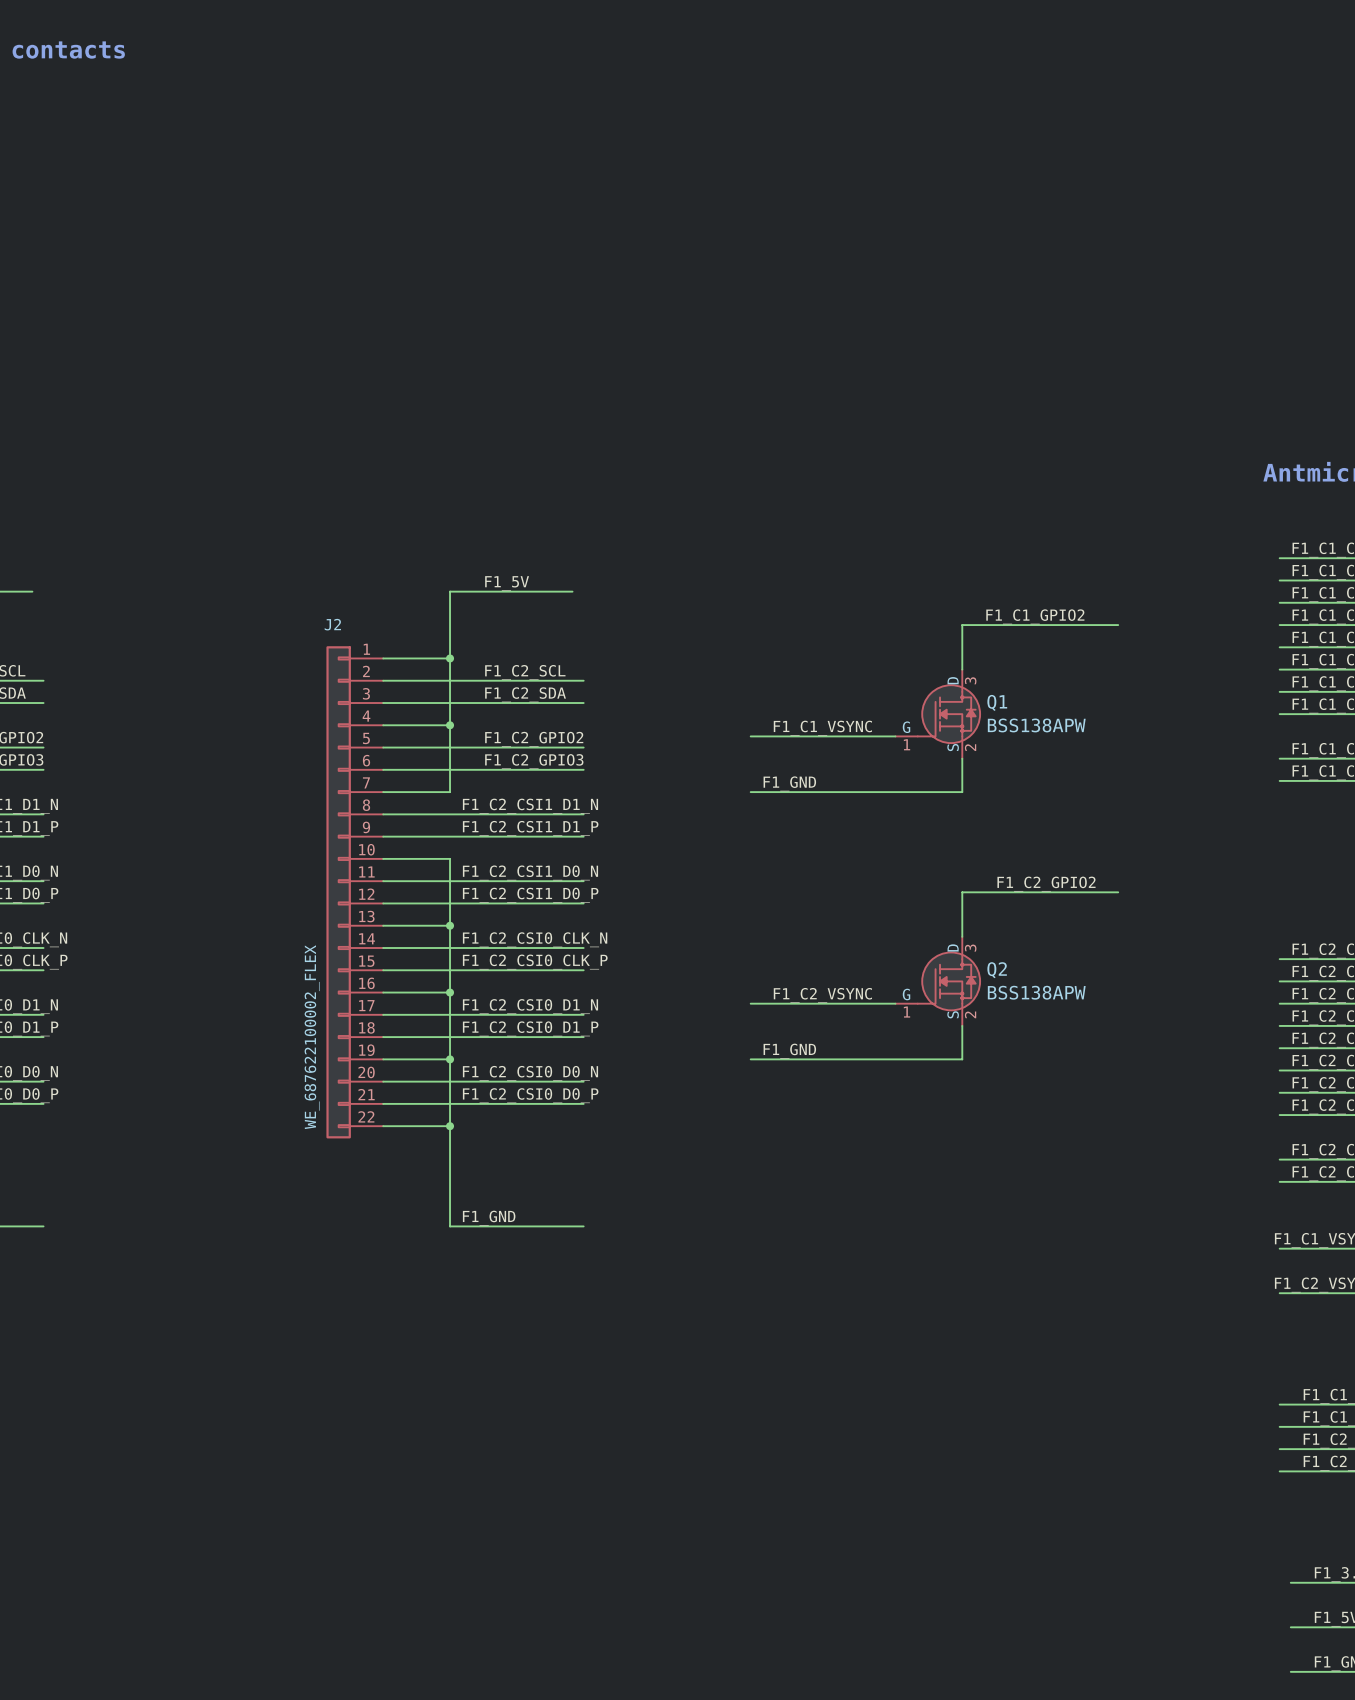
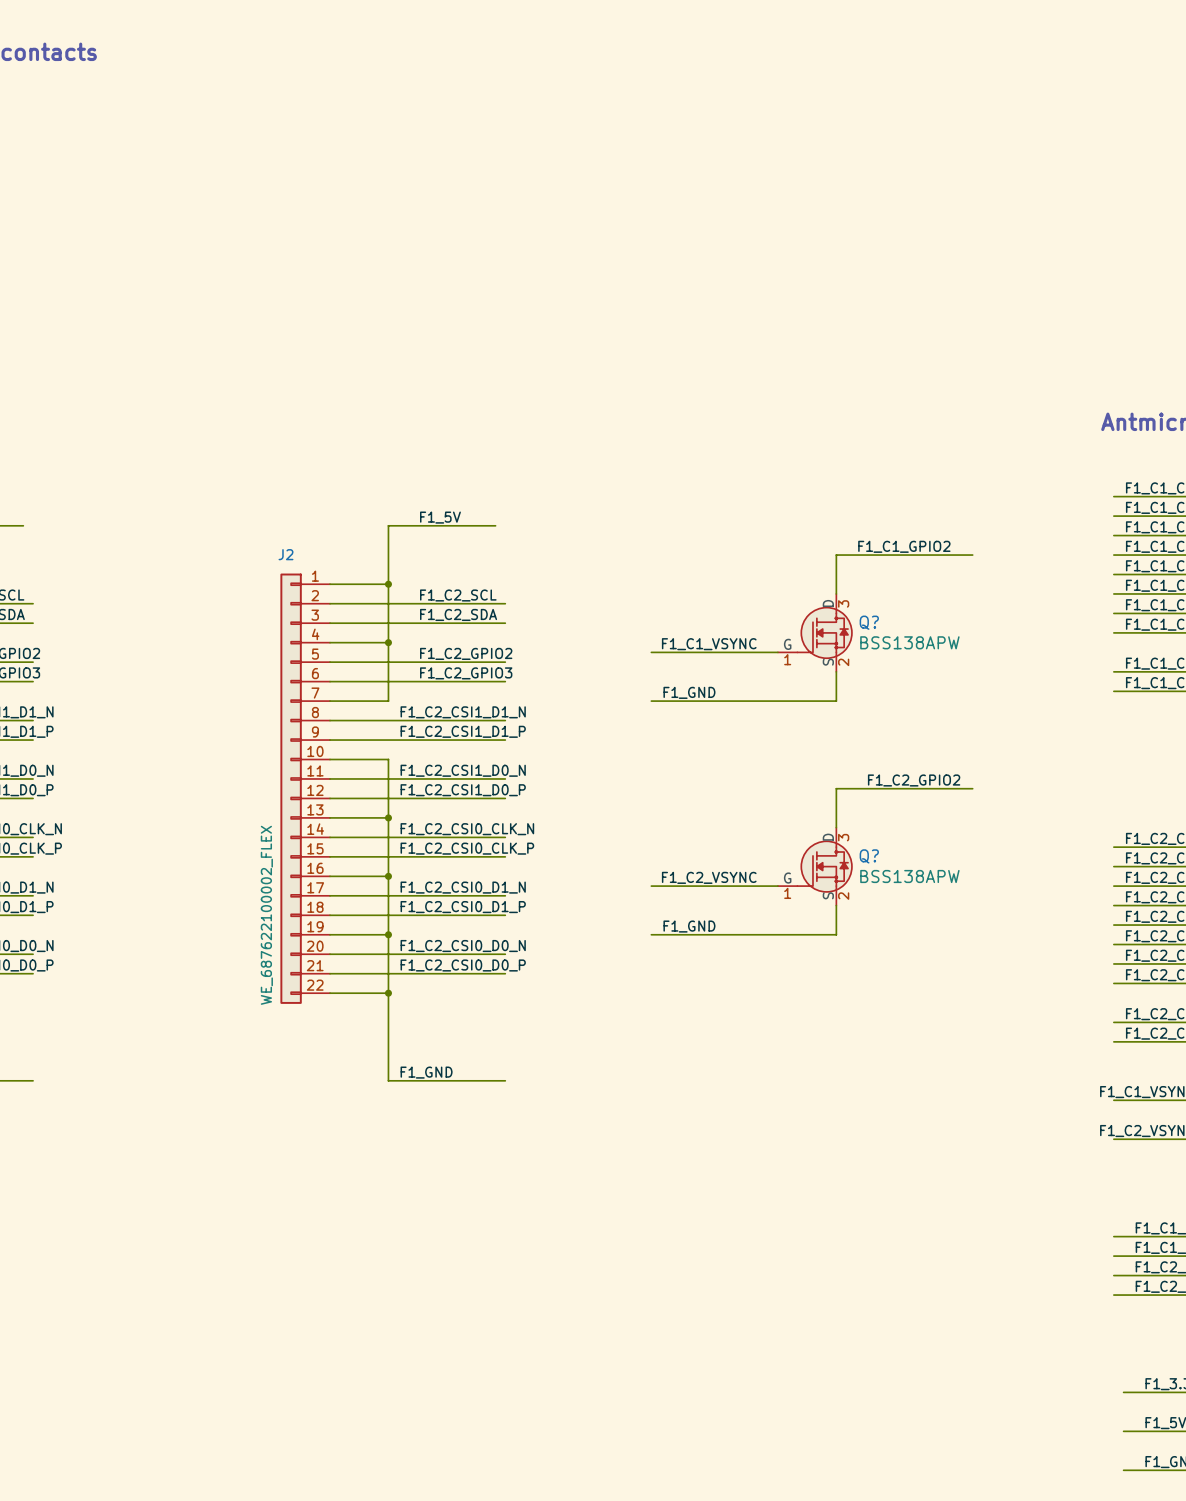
Q1 name: Q1 (997, 702) -> Q? (869, 622)
Q2 name: Q2 (997, 970) -> Q? (869, 856)

